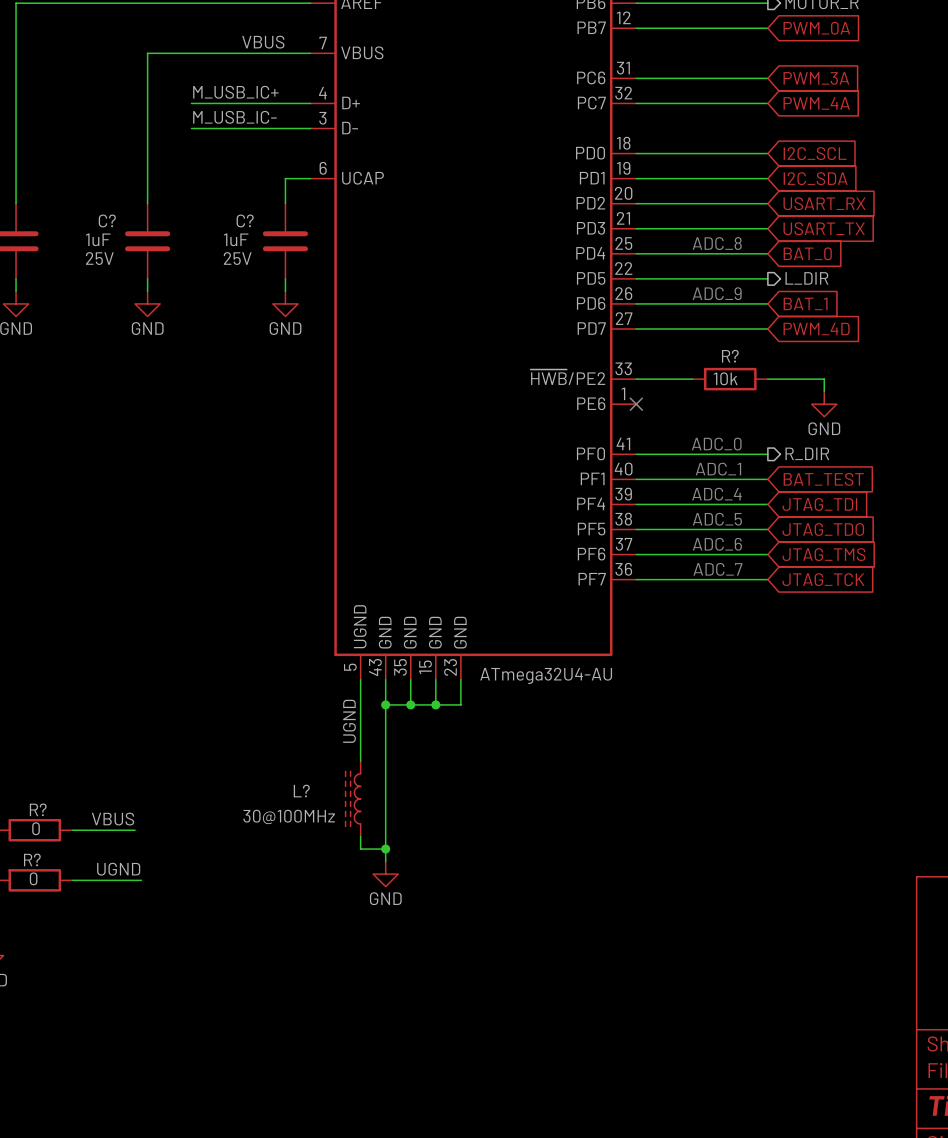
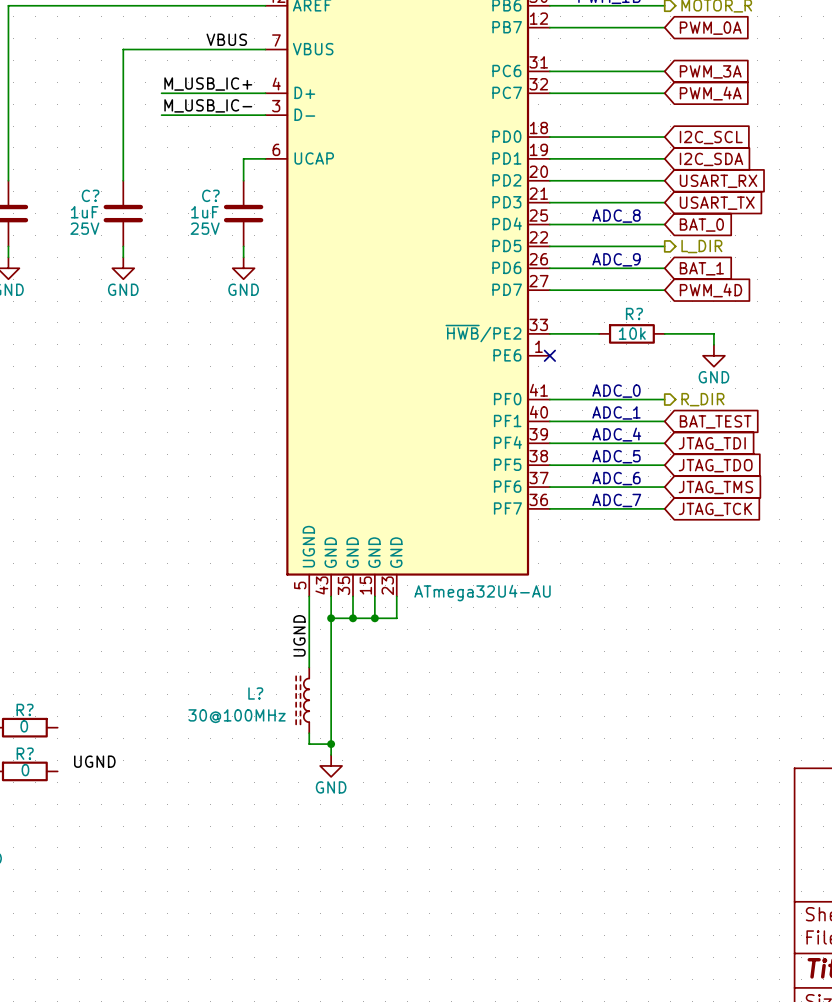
label: VBUS (112, 819) -> none
wire: (72, 830) (135, 830) -> none
wire: (72, 880) (141, 880) -> none

